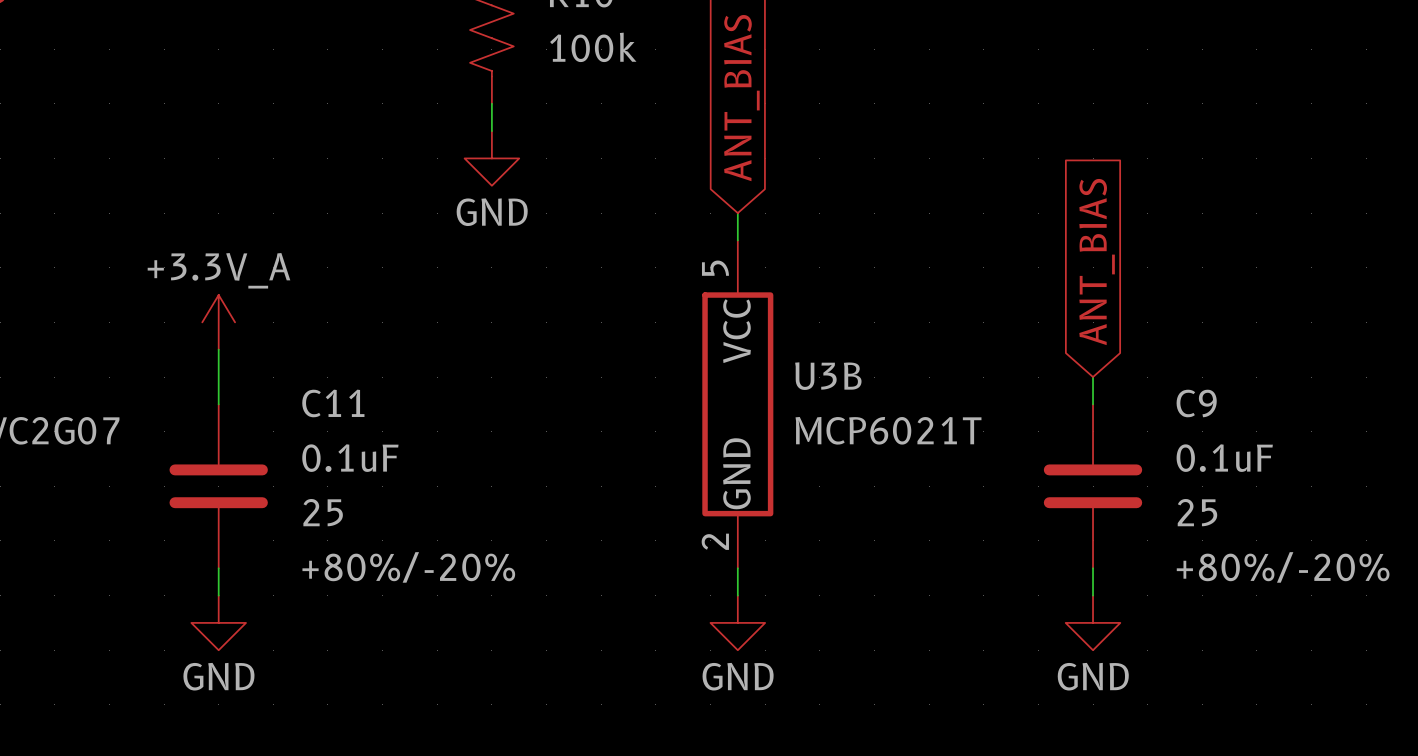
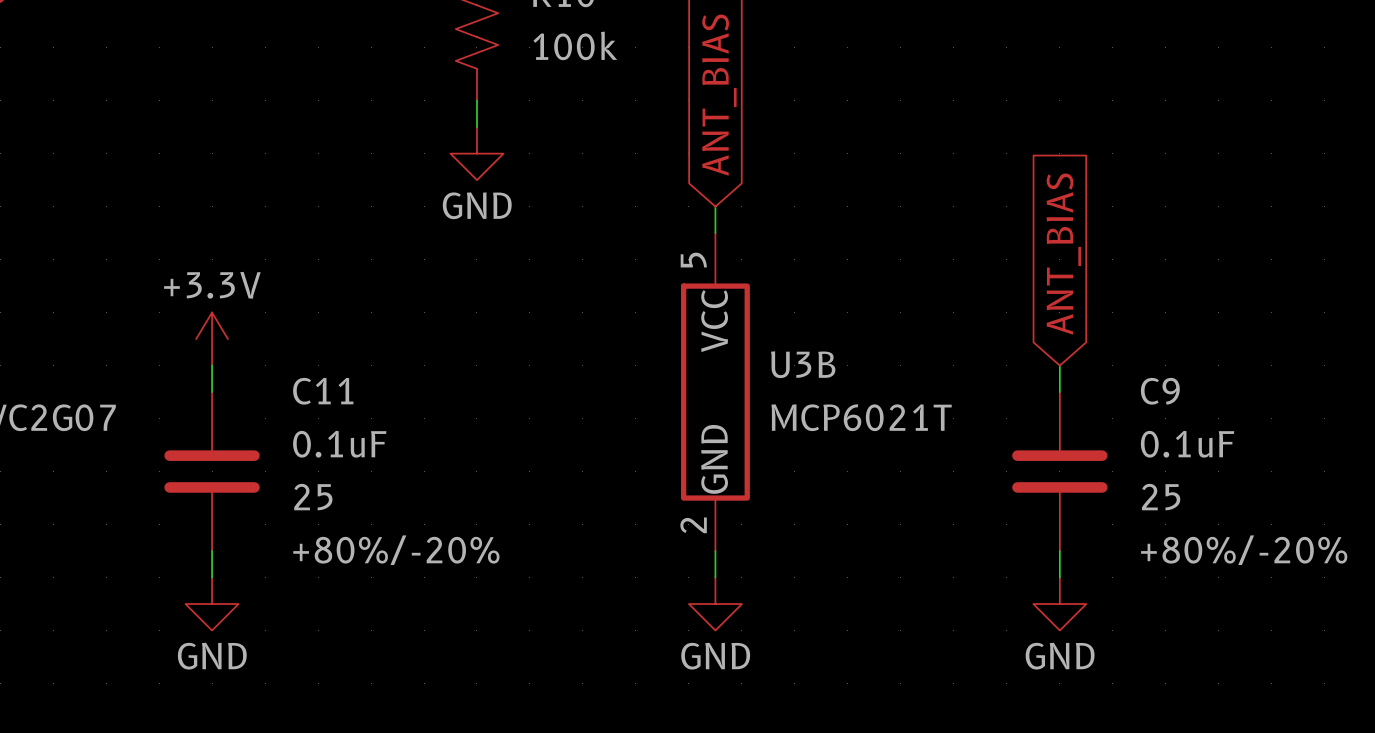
power symbol: +3.3V_A (218, 322) -> none
power symbol: none -> +3.3V (212, 339)

